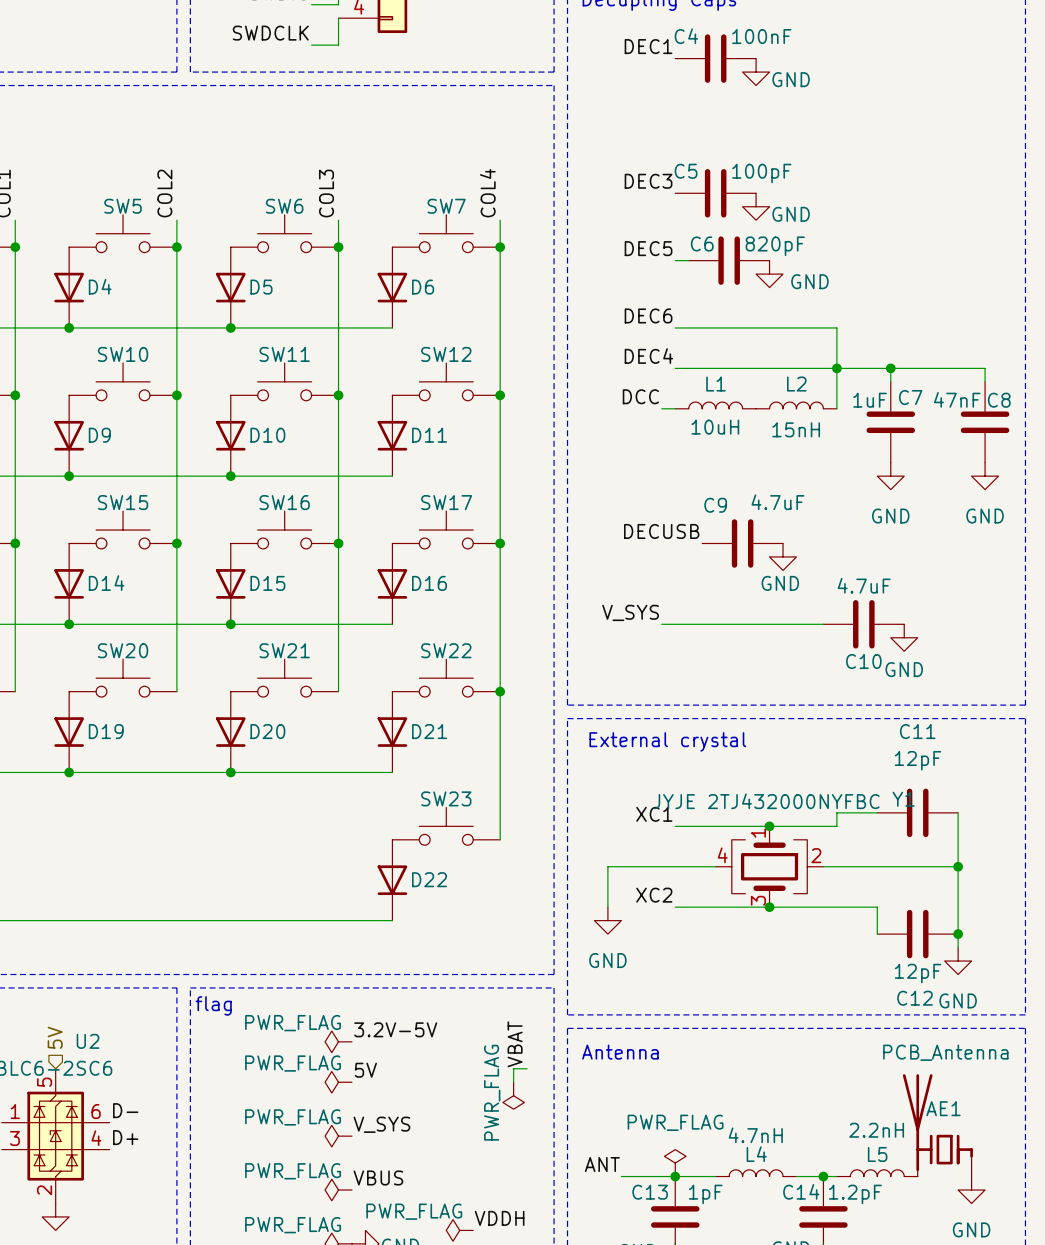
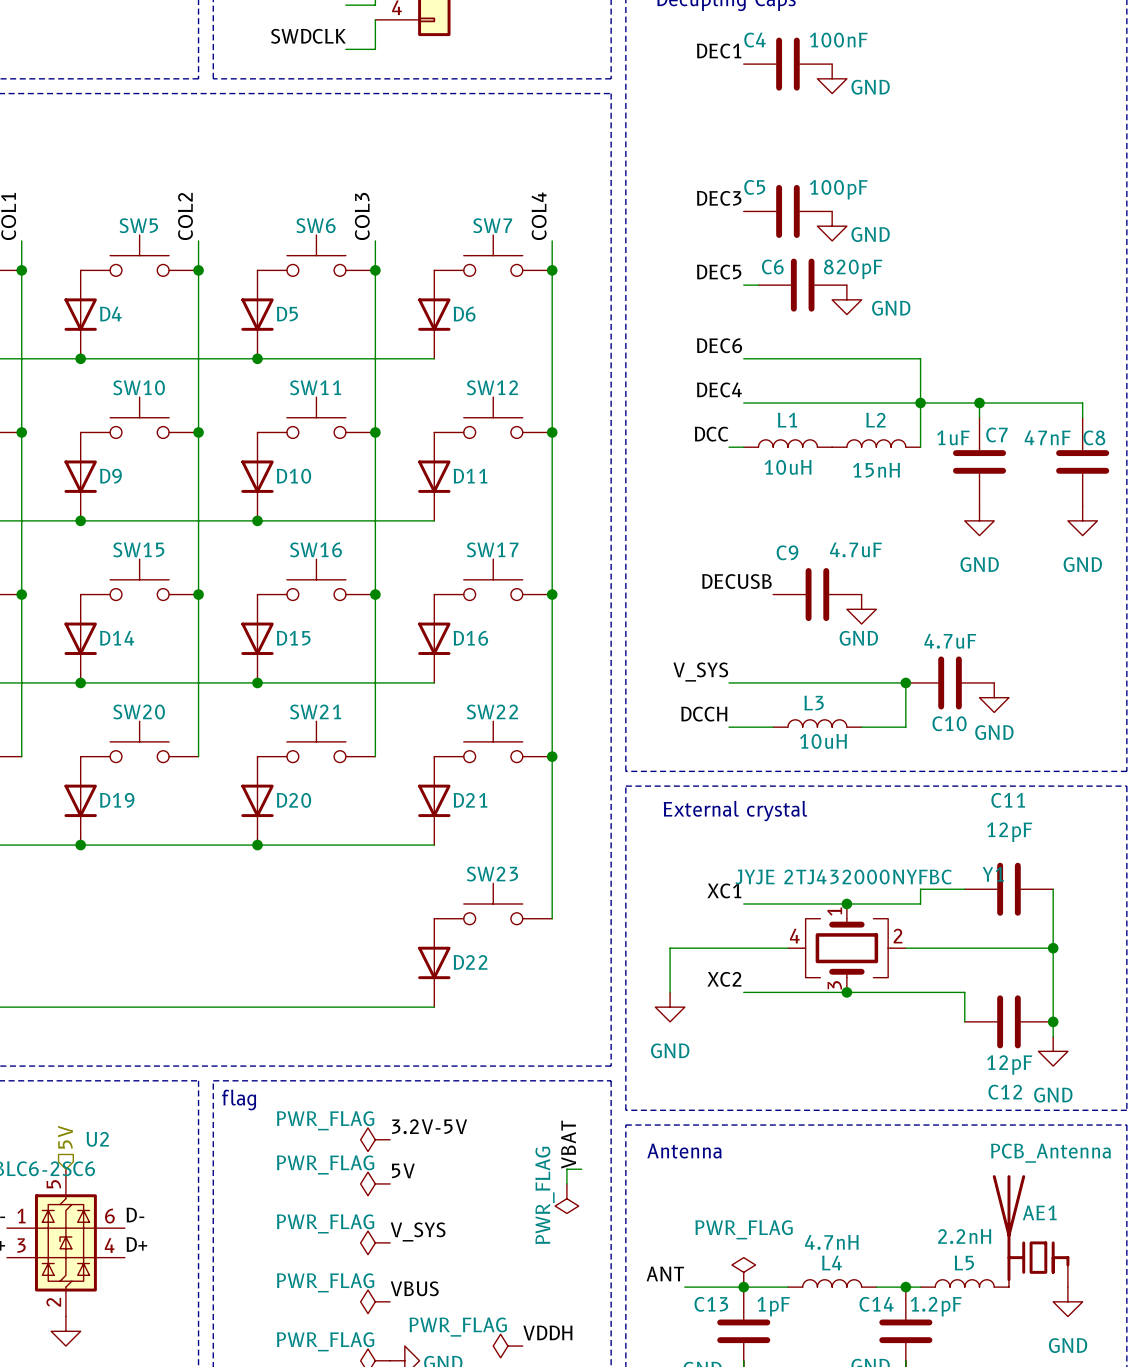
wire: none -> (905, 682) (905, 727) (861, 727)
junction: none -> (905, 682)
label: none -> DCCH (704, 714)
L3: none -> 10uH (817, 723)
wire: none -> (729, 727) (773, 727)

